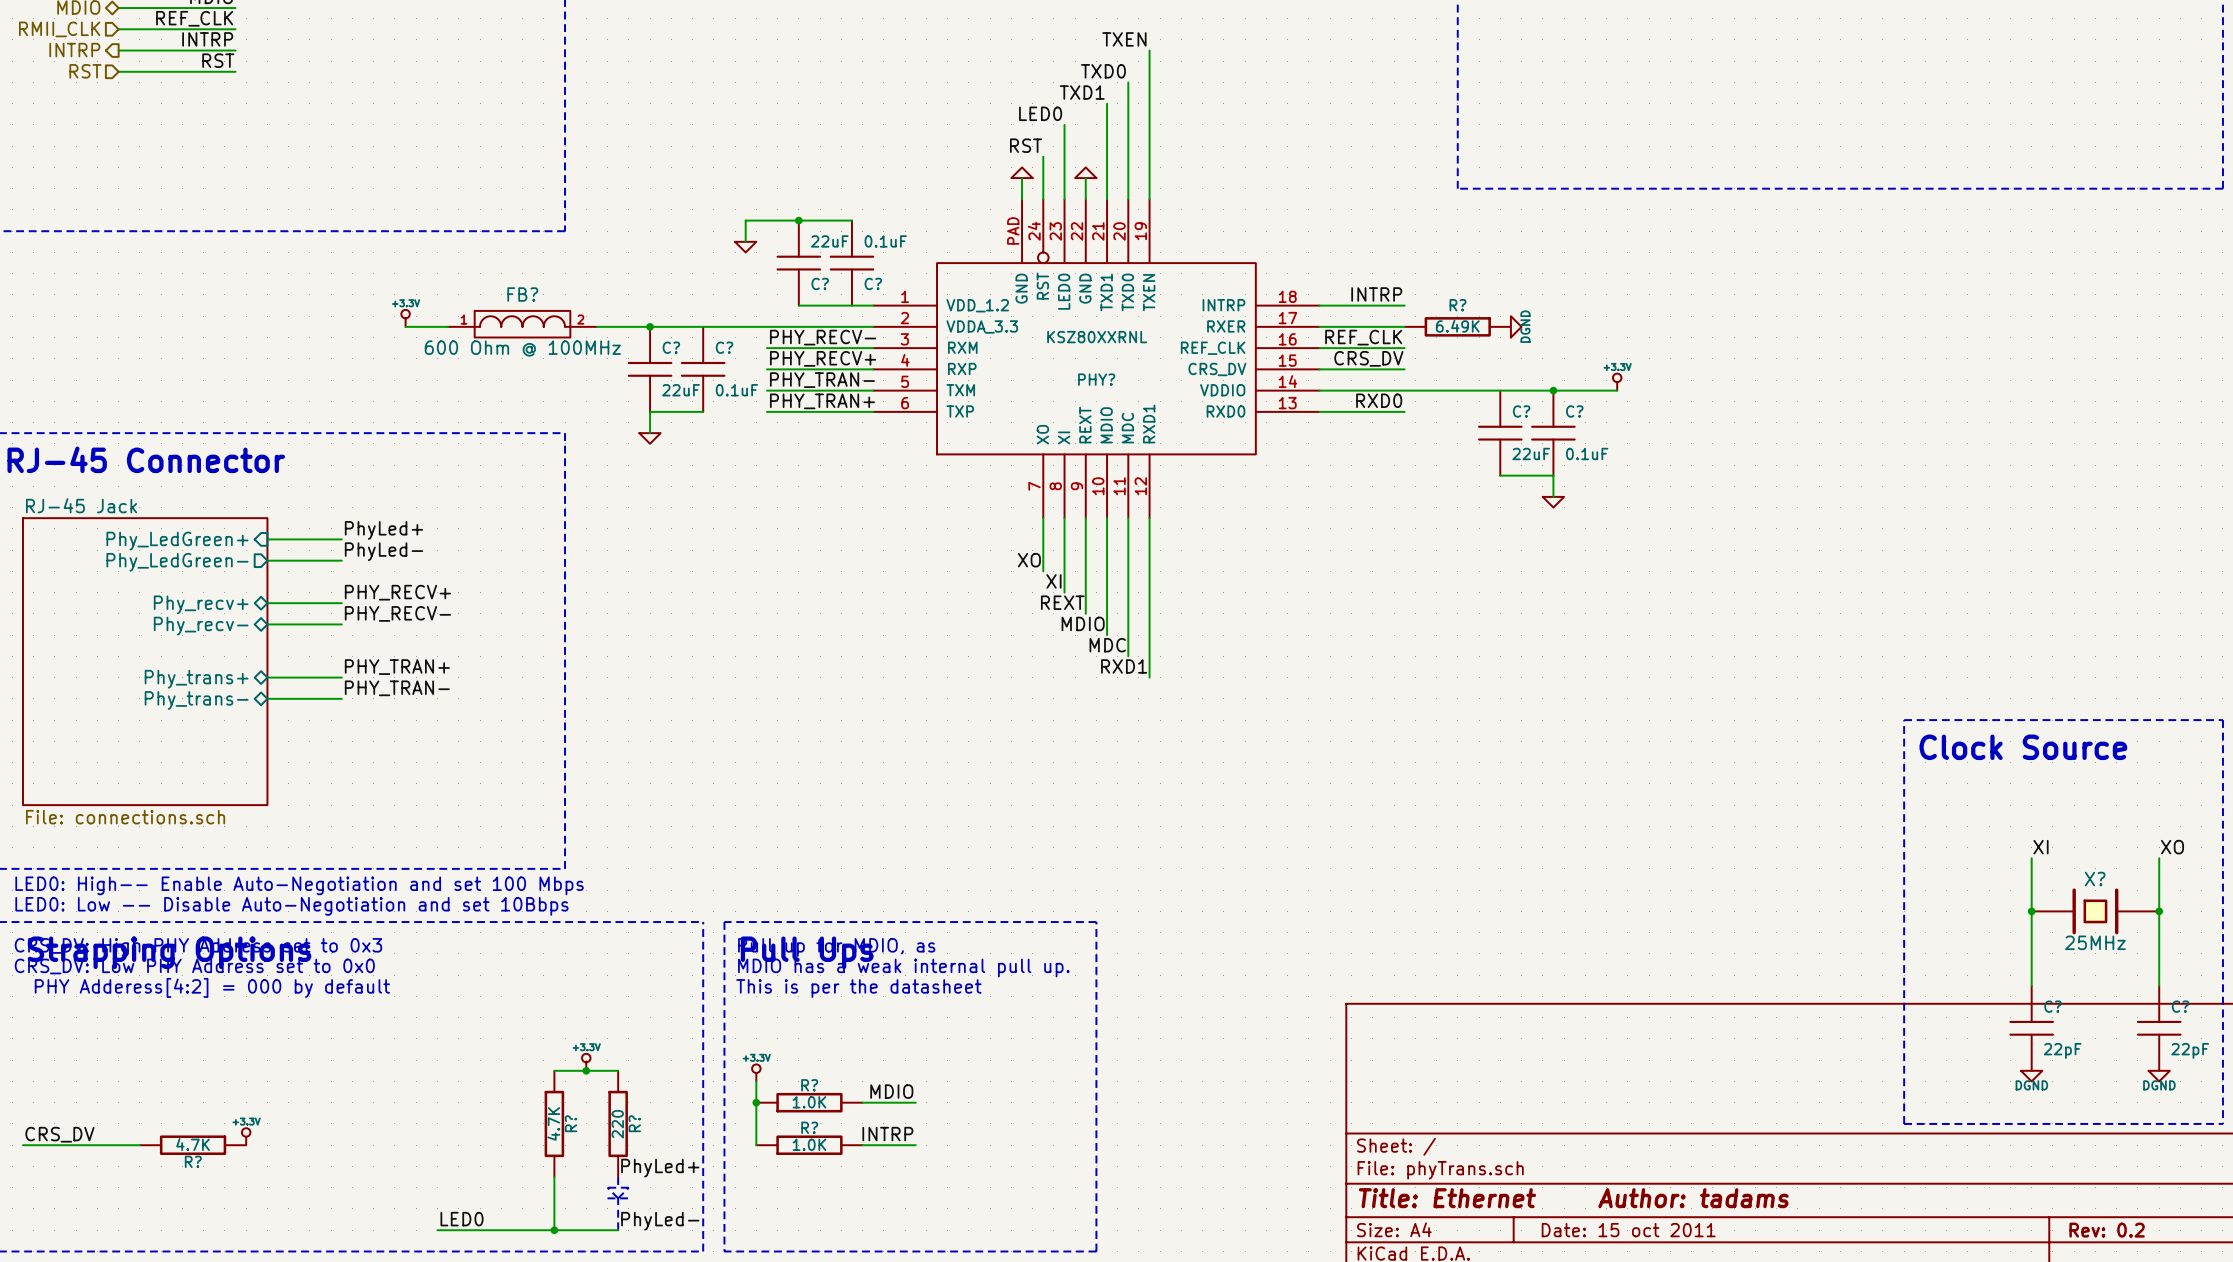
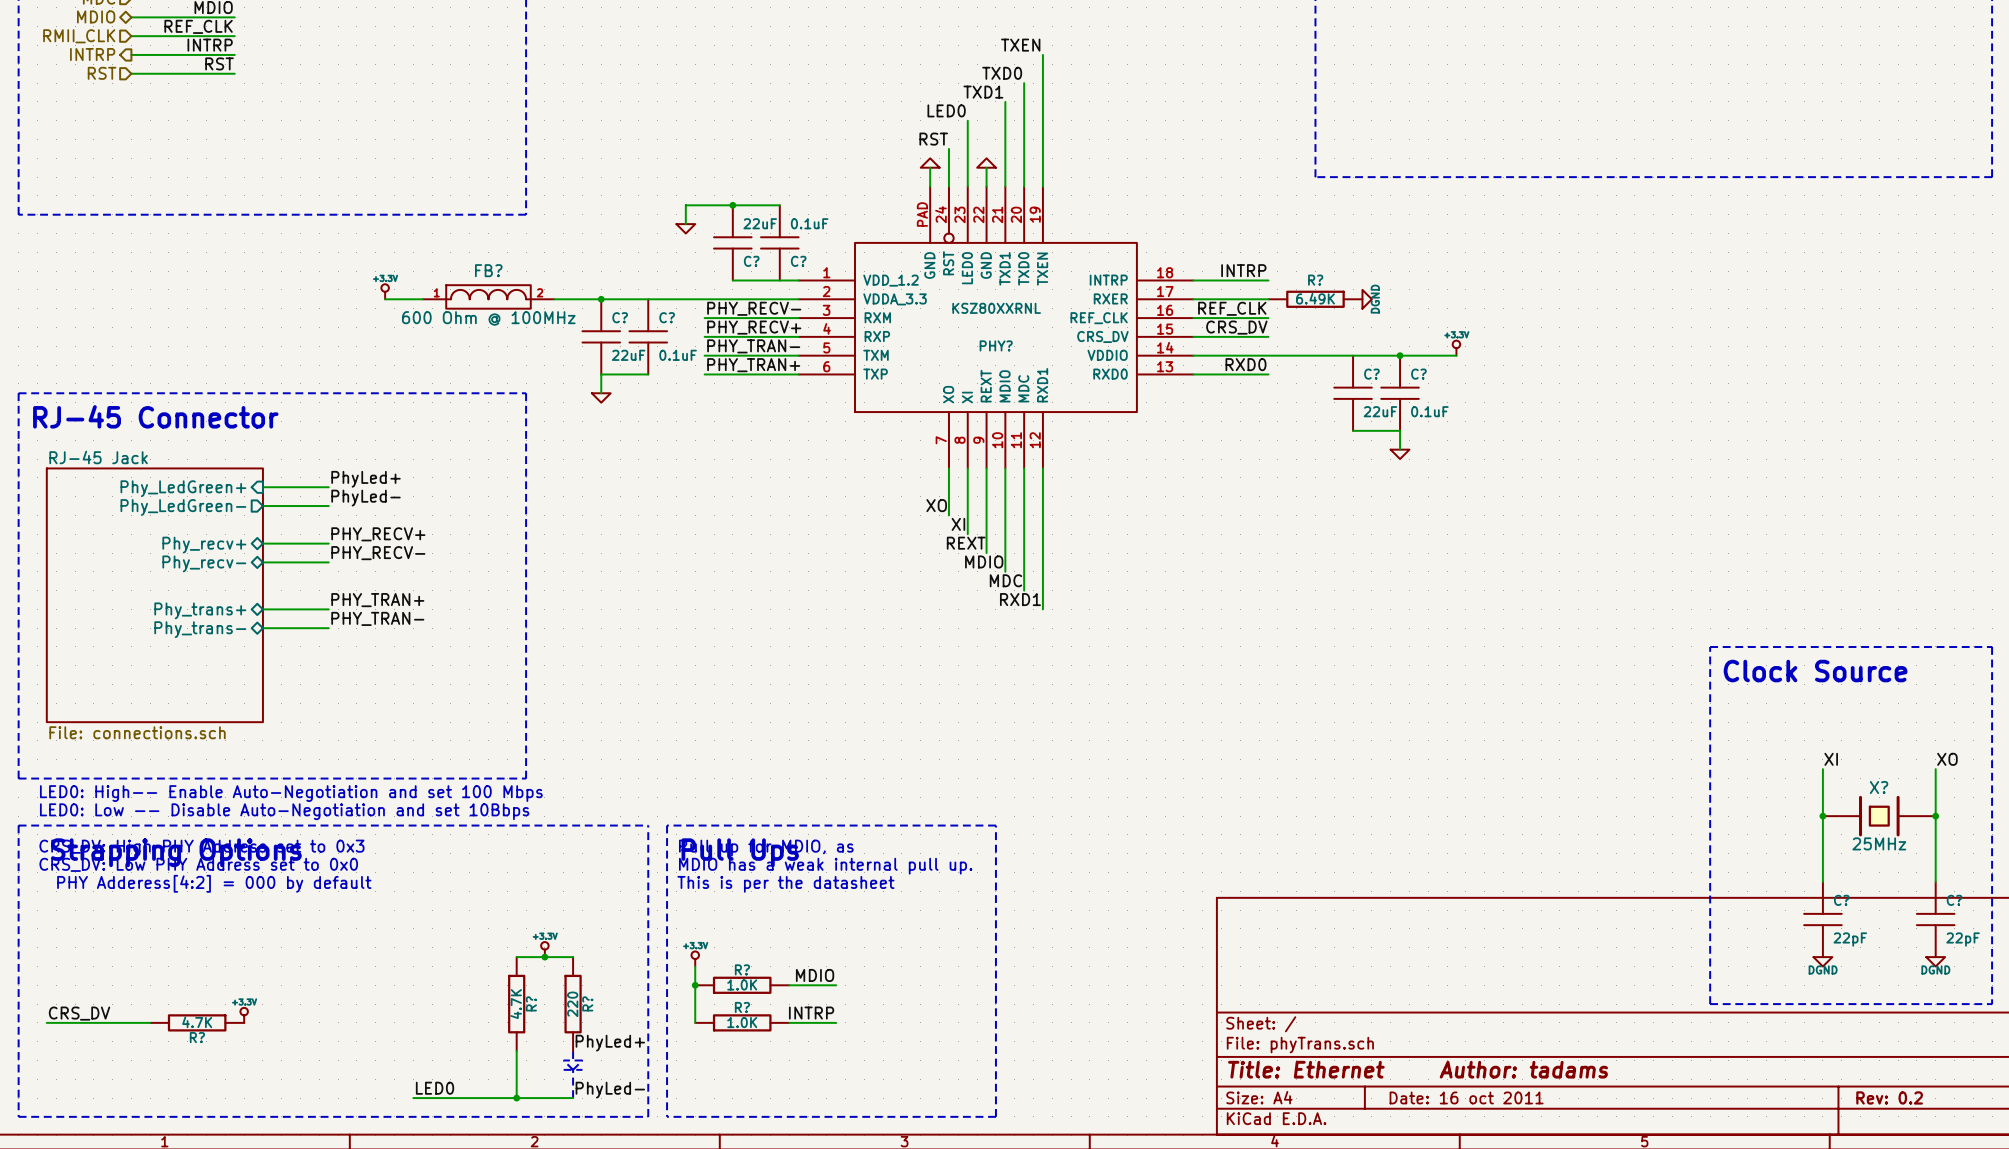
title block: Date: 15 oct 2011 (1628, 1230) -> Date: 16 oct 2011 (1466, 1097)

